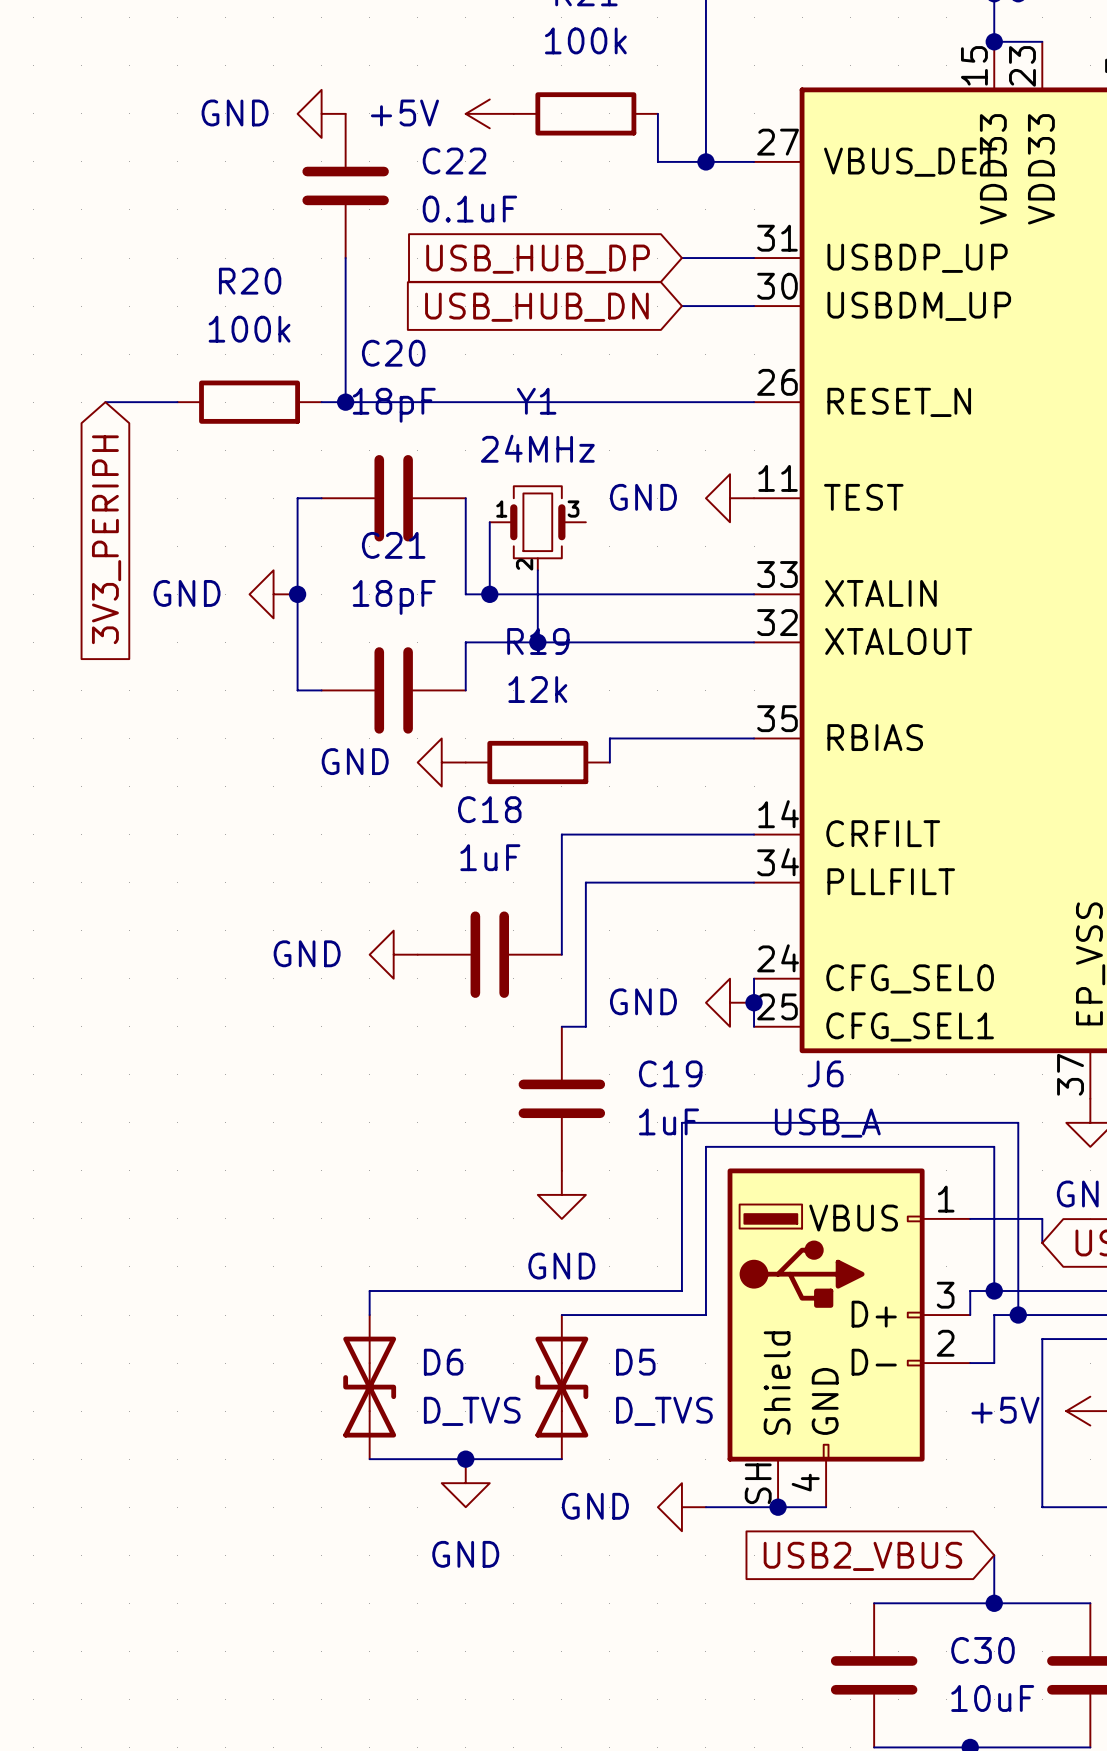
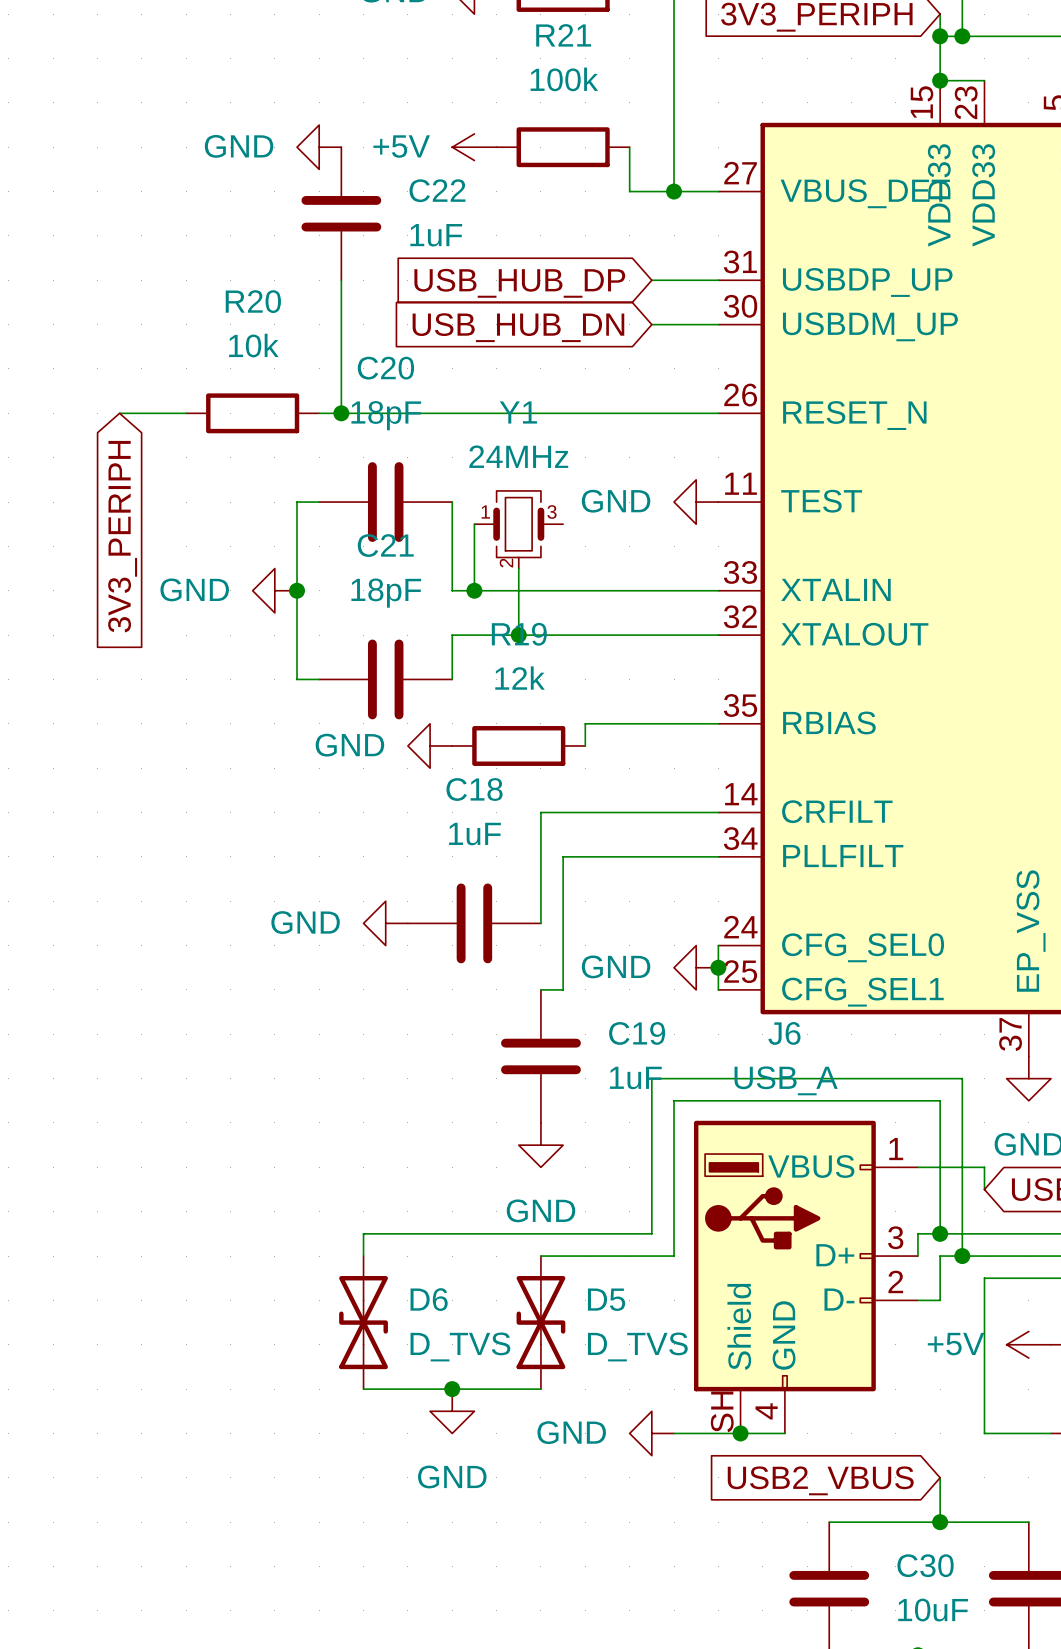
C22 value: 0.1uF (469, 209) -> 1uF (436, 235)
R20 value: 100k (249, 329) -> 10k (253, 345)

